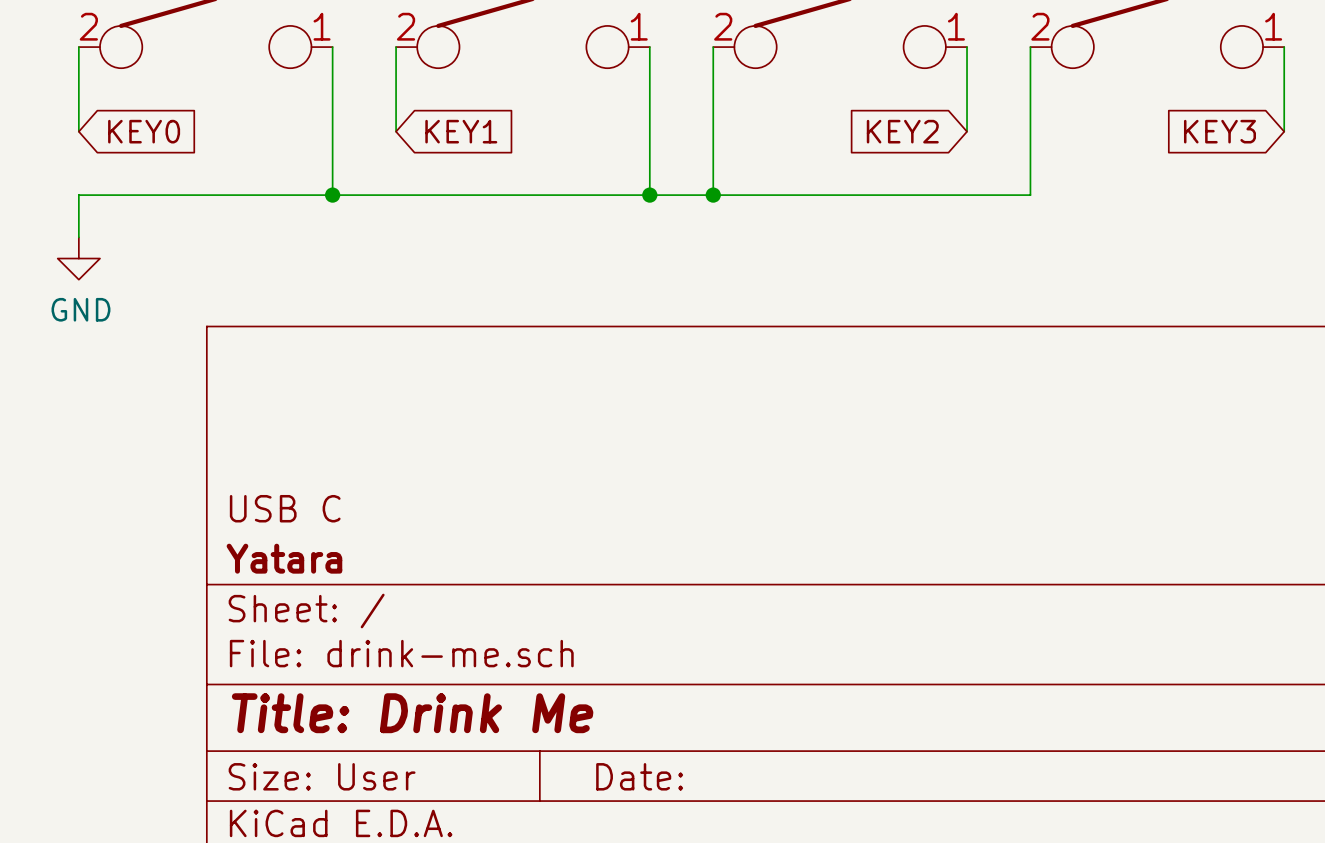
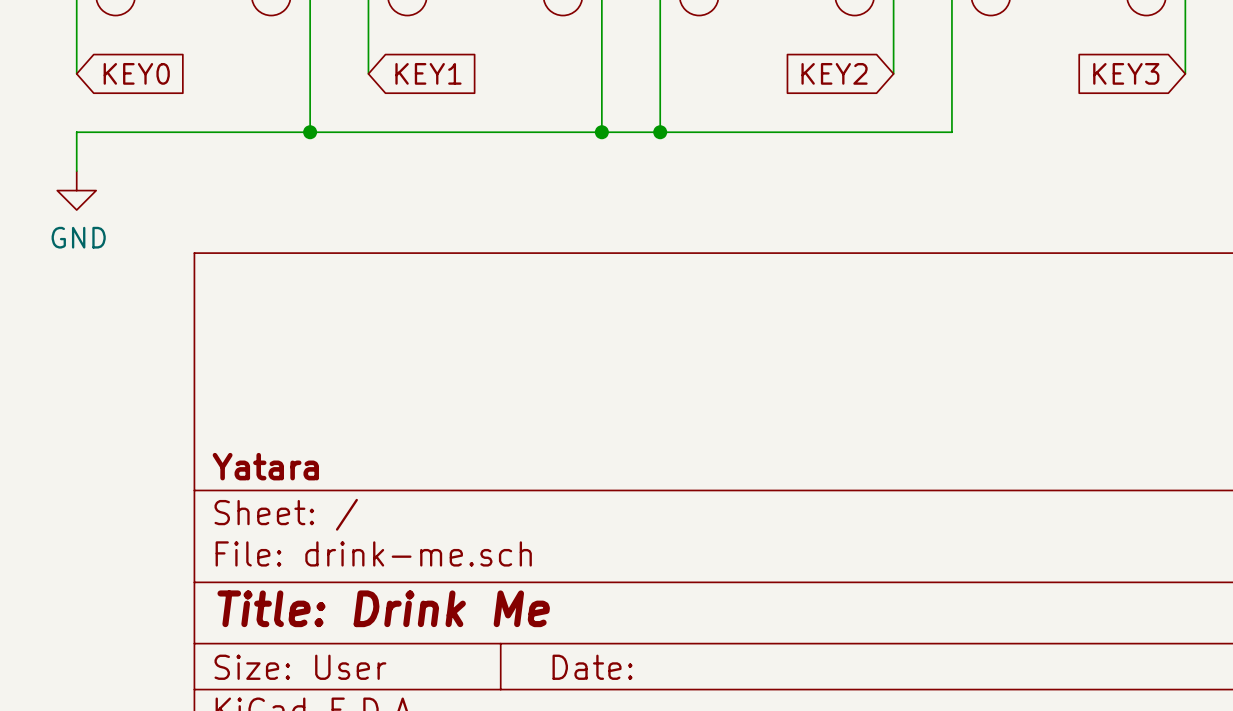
title block: USB C (285, 508) -> none

